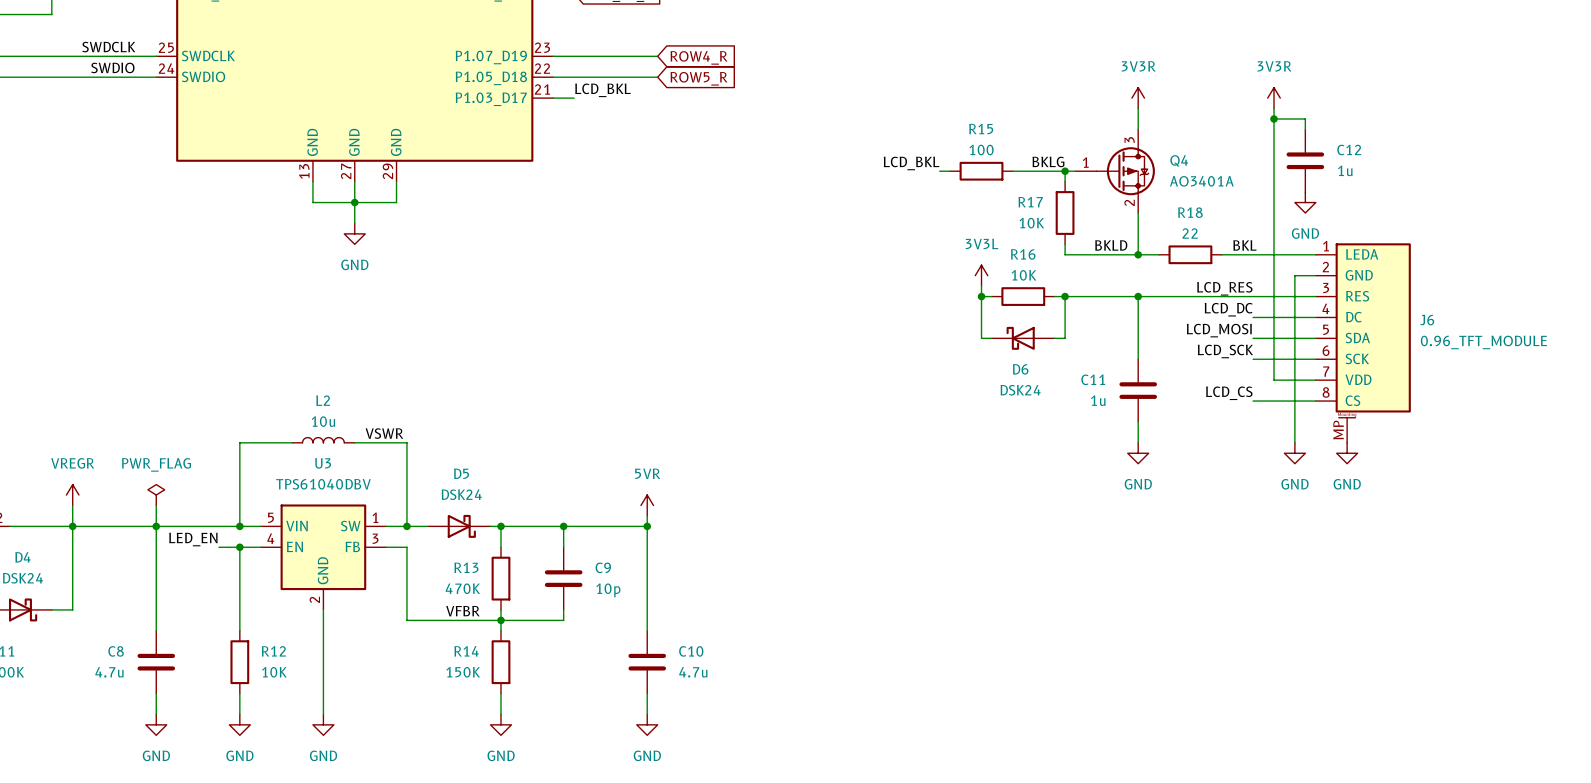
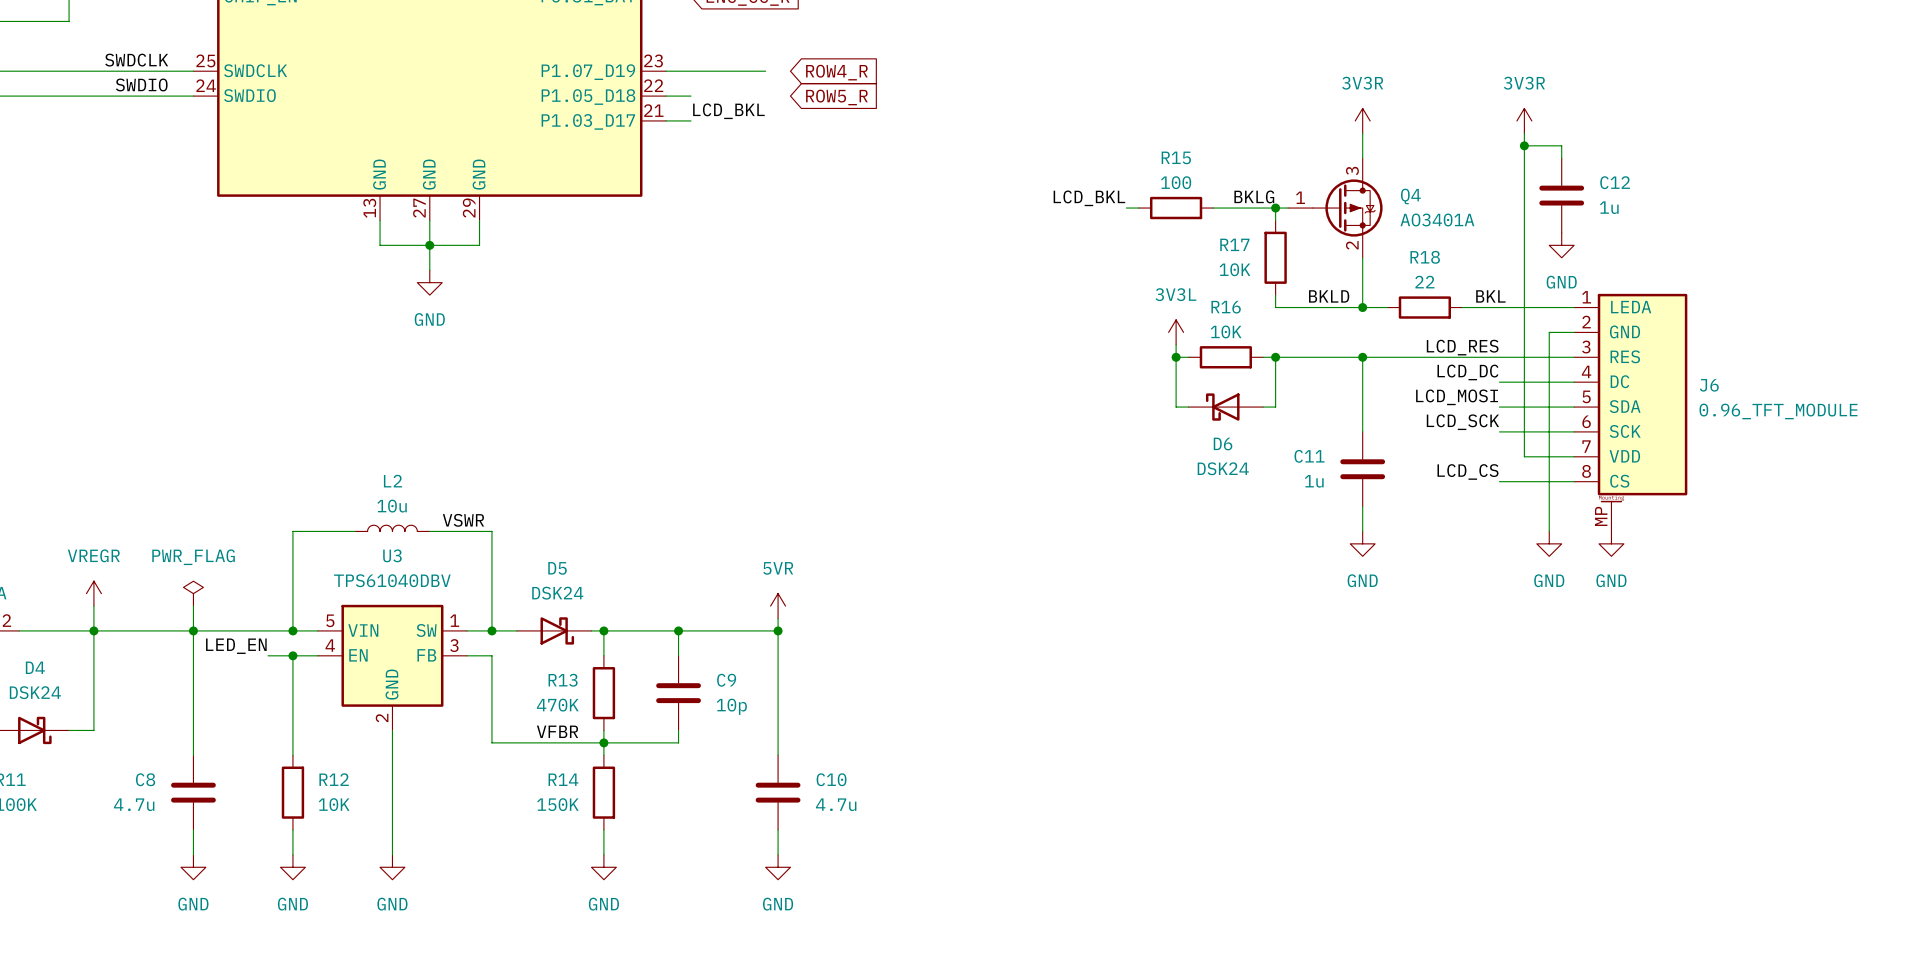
wire: (636, 56) (657, 56) -> none
wire: (574, 77) (657, 77) -> none

